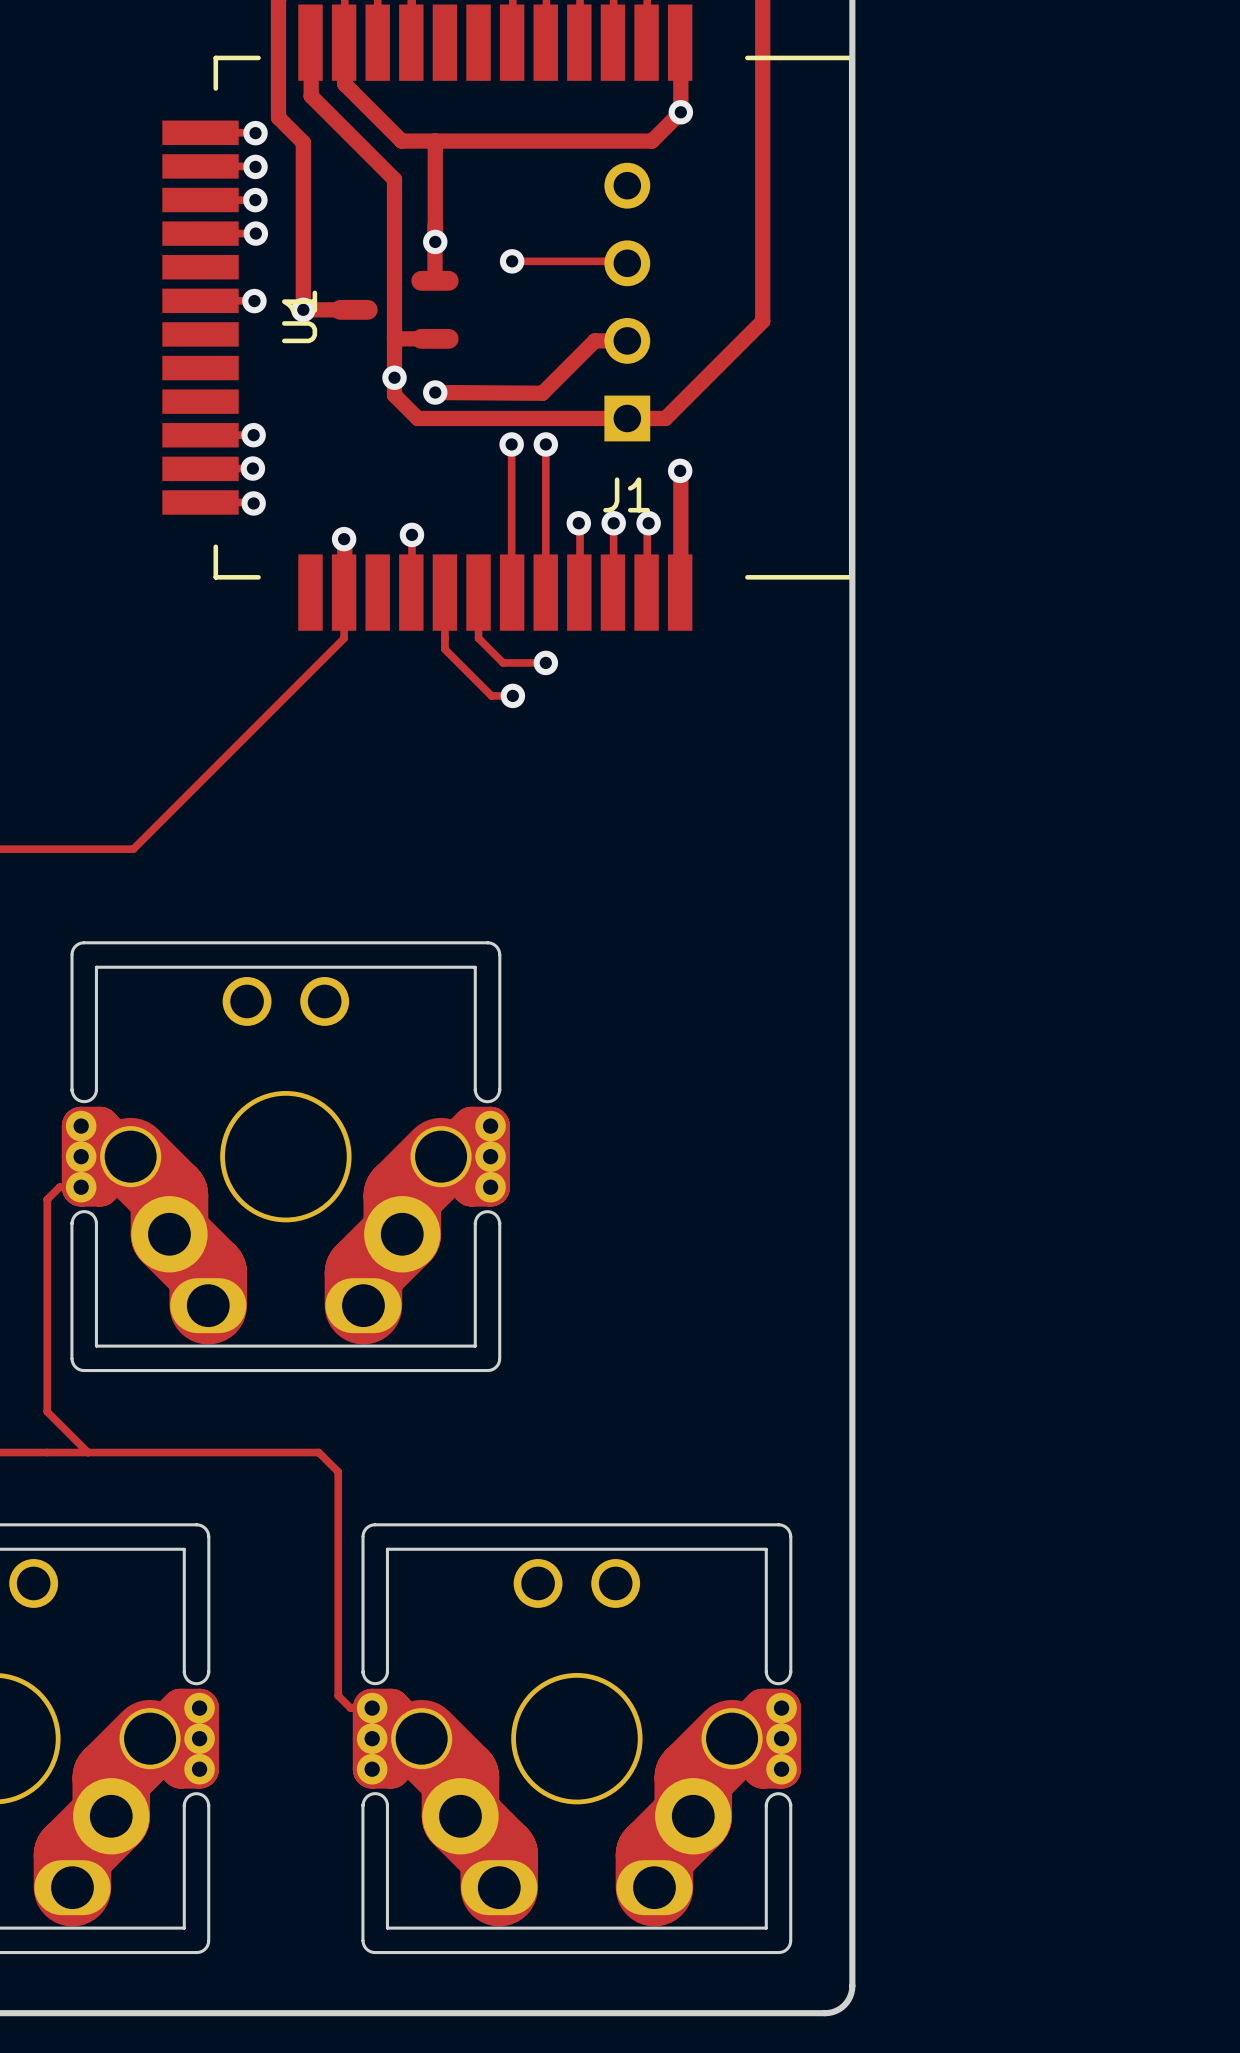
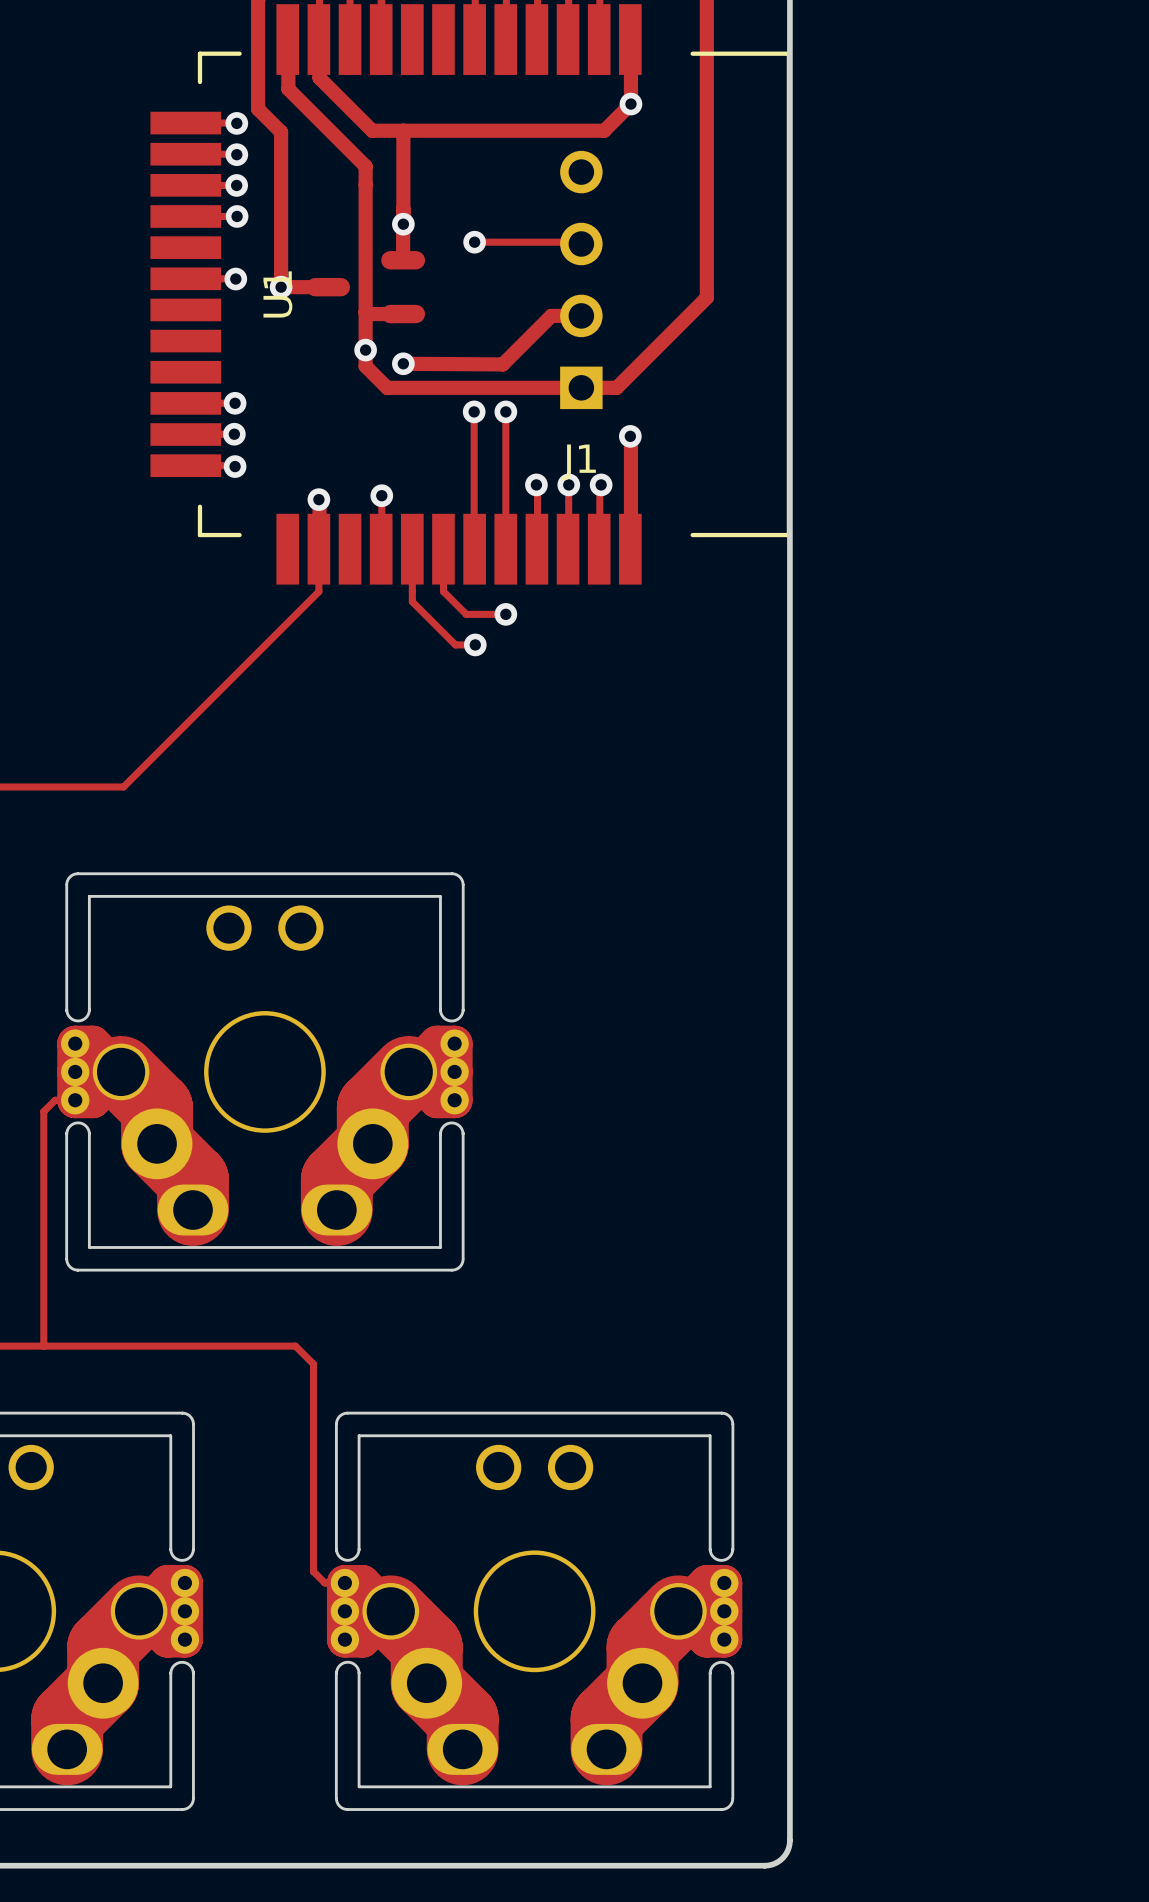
track: (47, 1411) (87, 1452) -> (43, 1308) (43, 1346)

